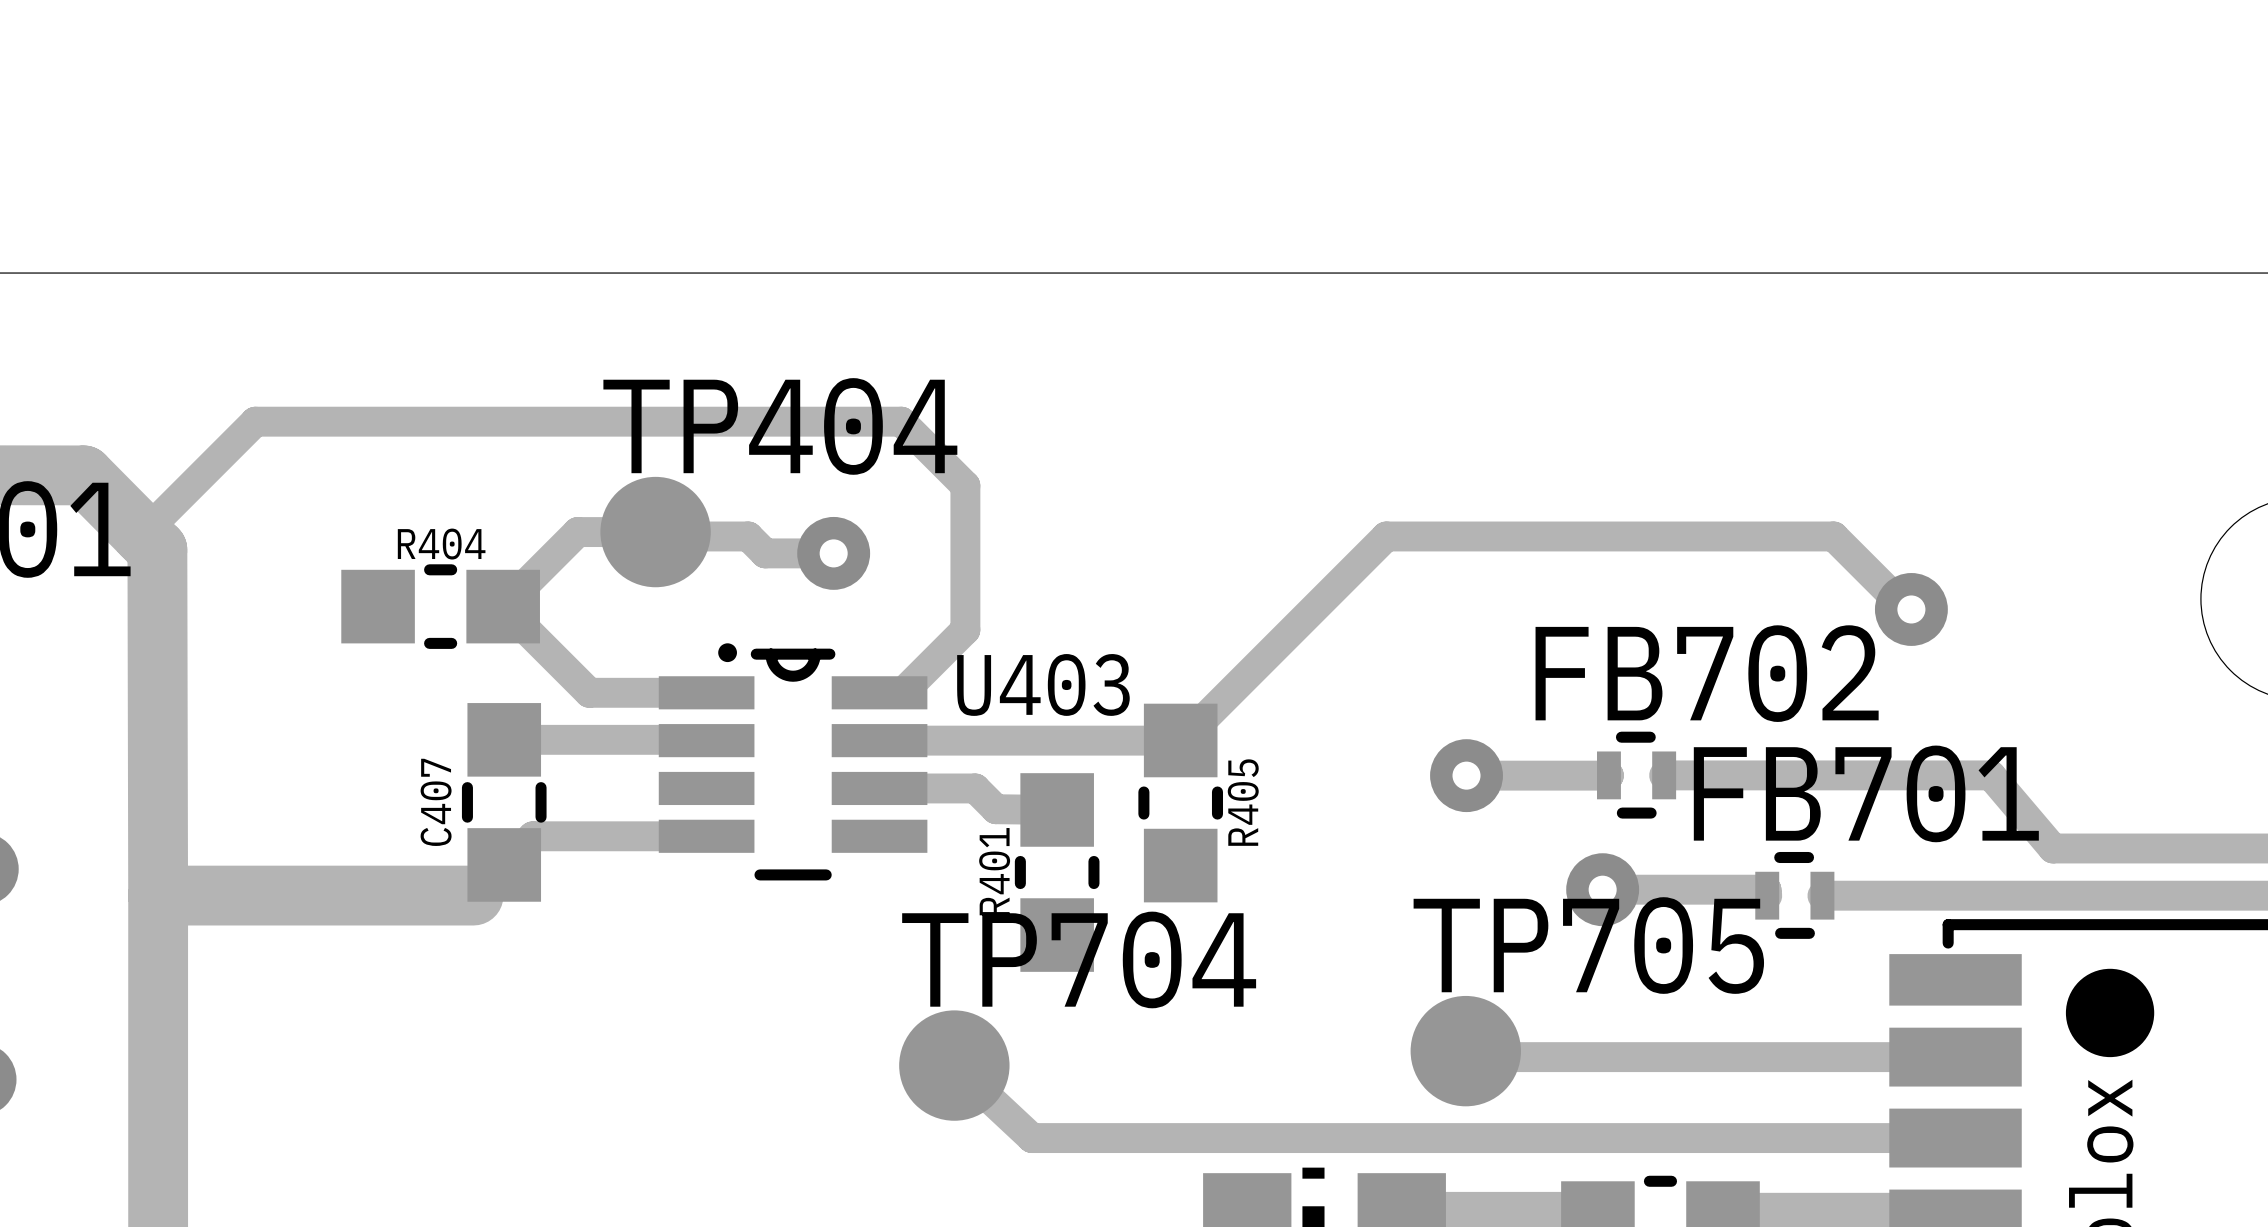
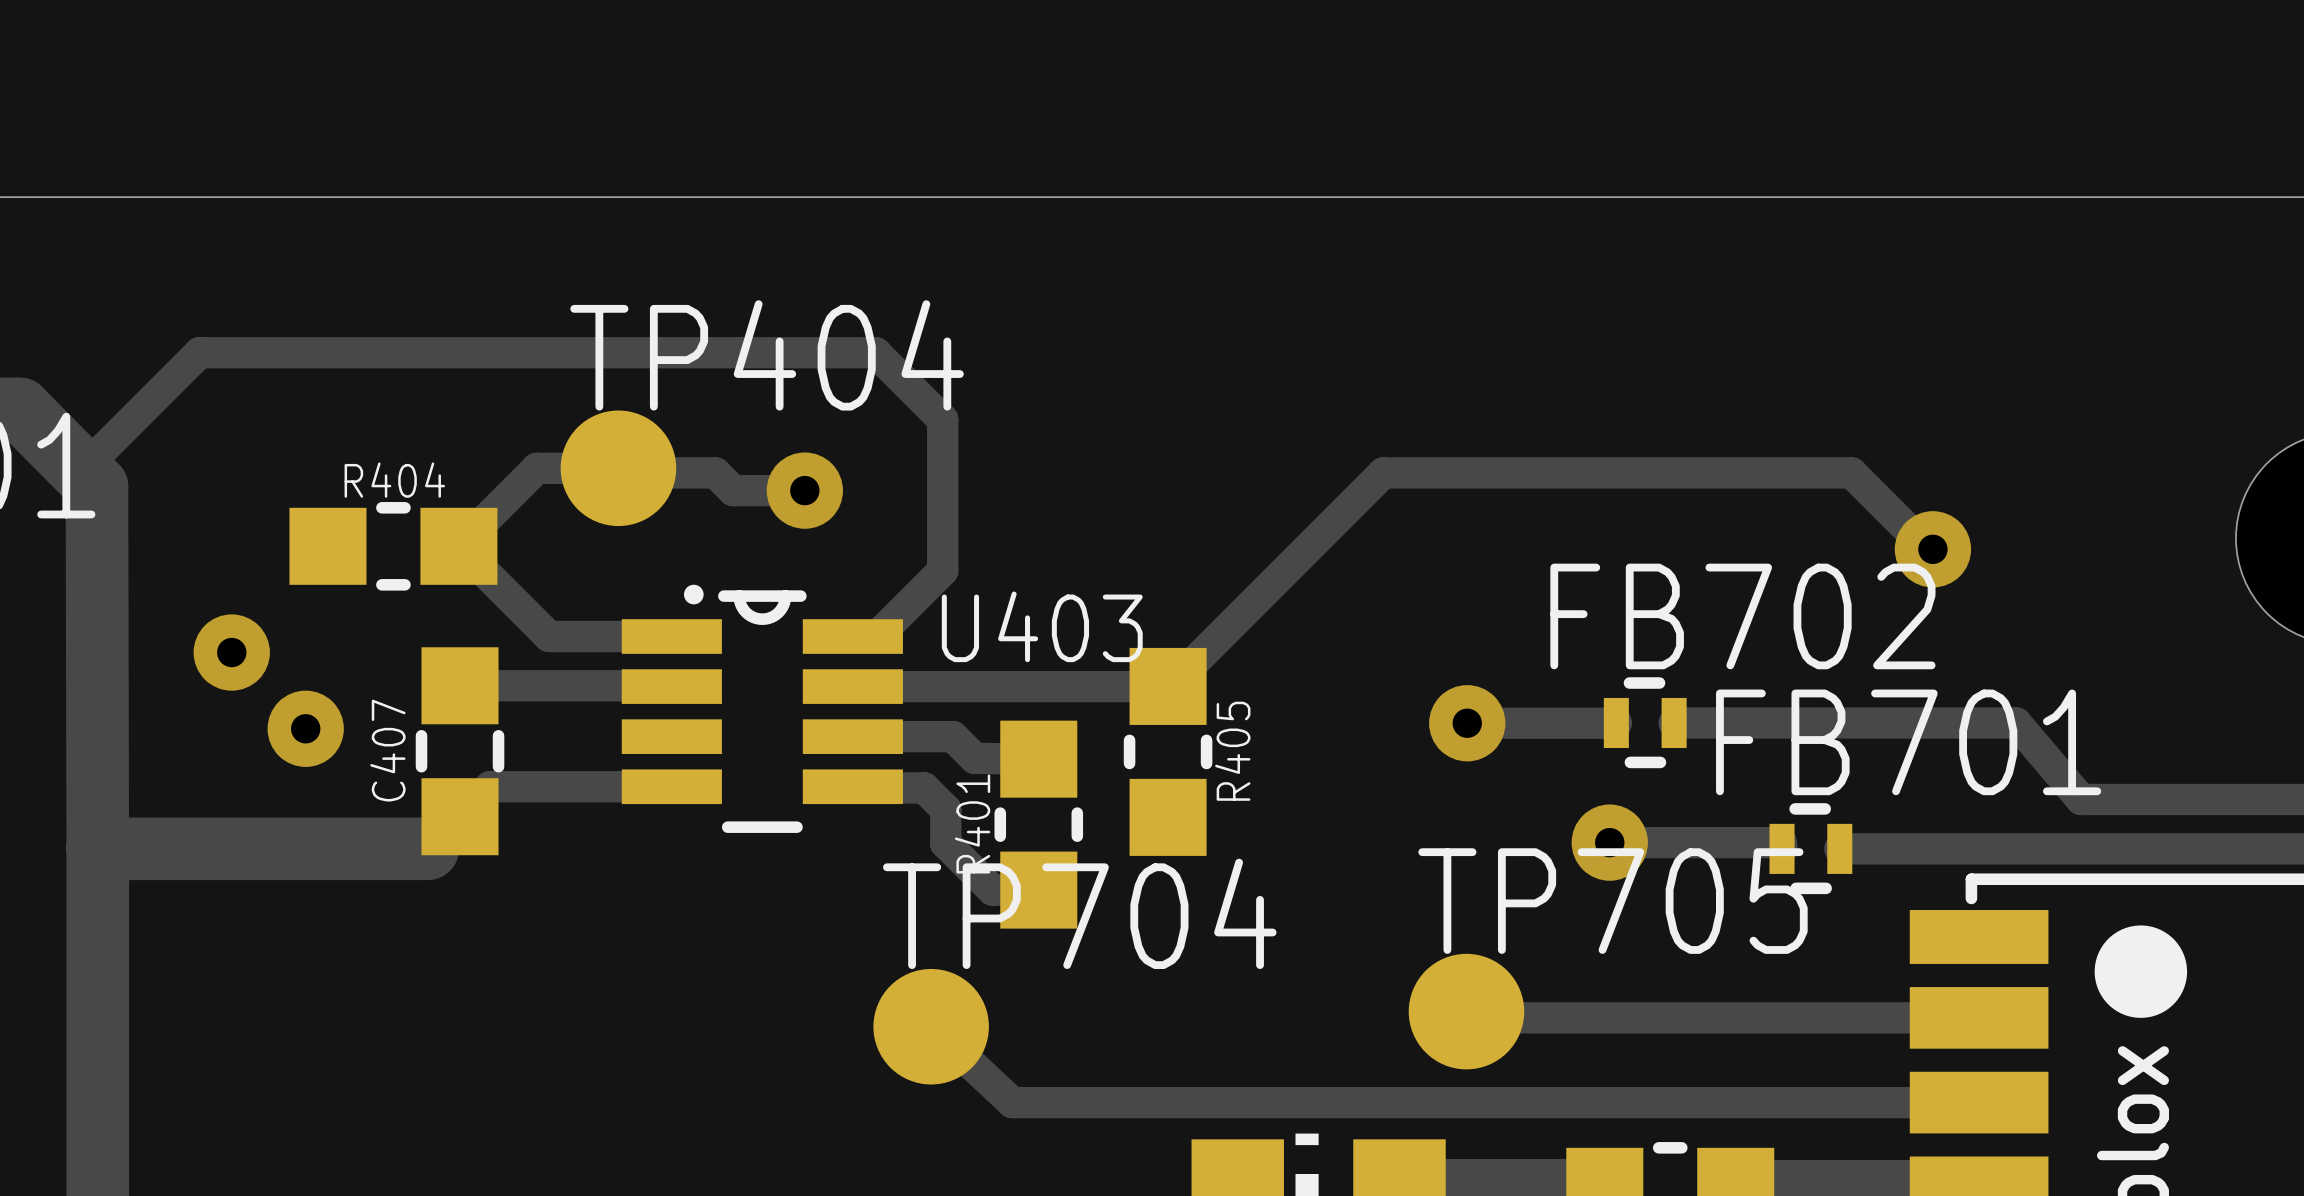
via: none -> (231, 652)
via: none -> (305, 728)
track: none -> (852, 786) (924, 787) (945, 809) (945, 843) (992, 890) (1038, 890)

